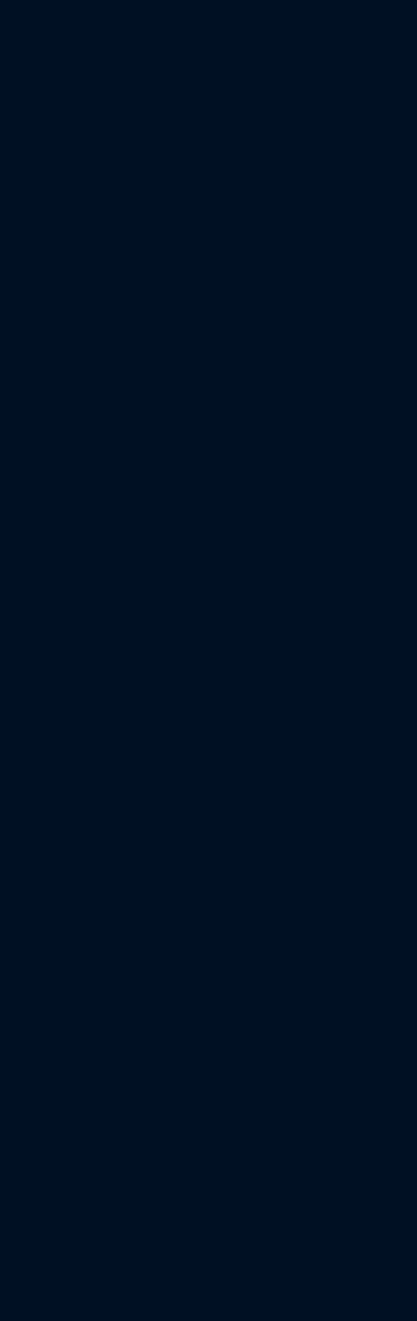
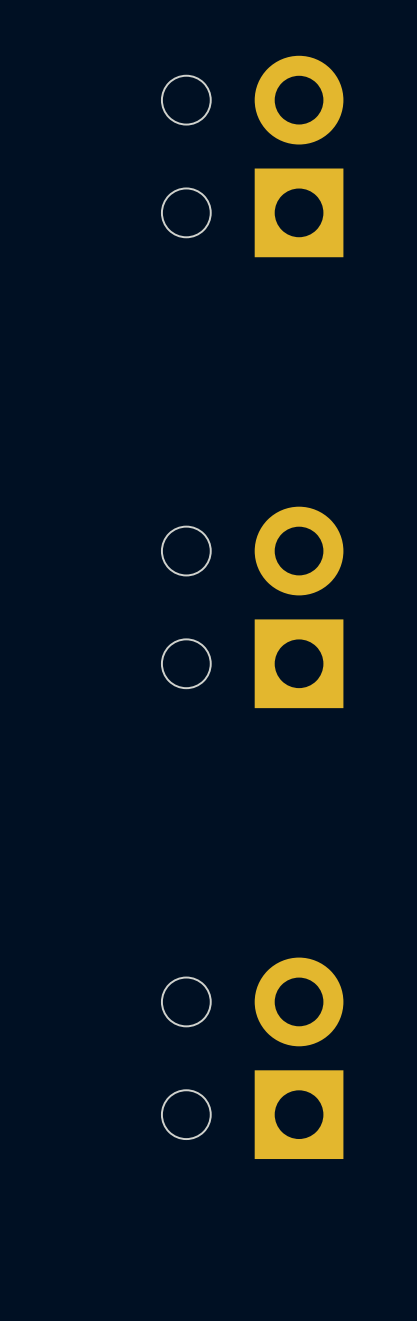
part: none -> (252, 156)
part: none -> (252, 607)
part: none -> (252, 1058)

